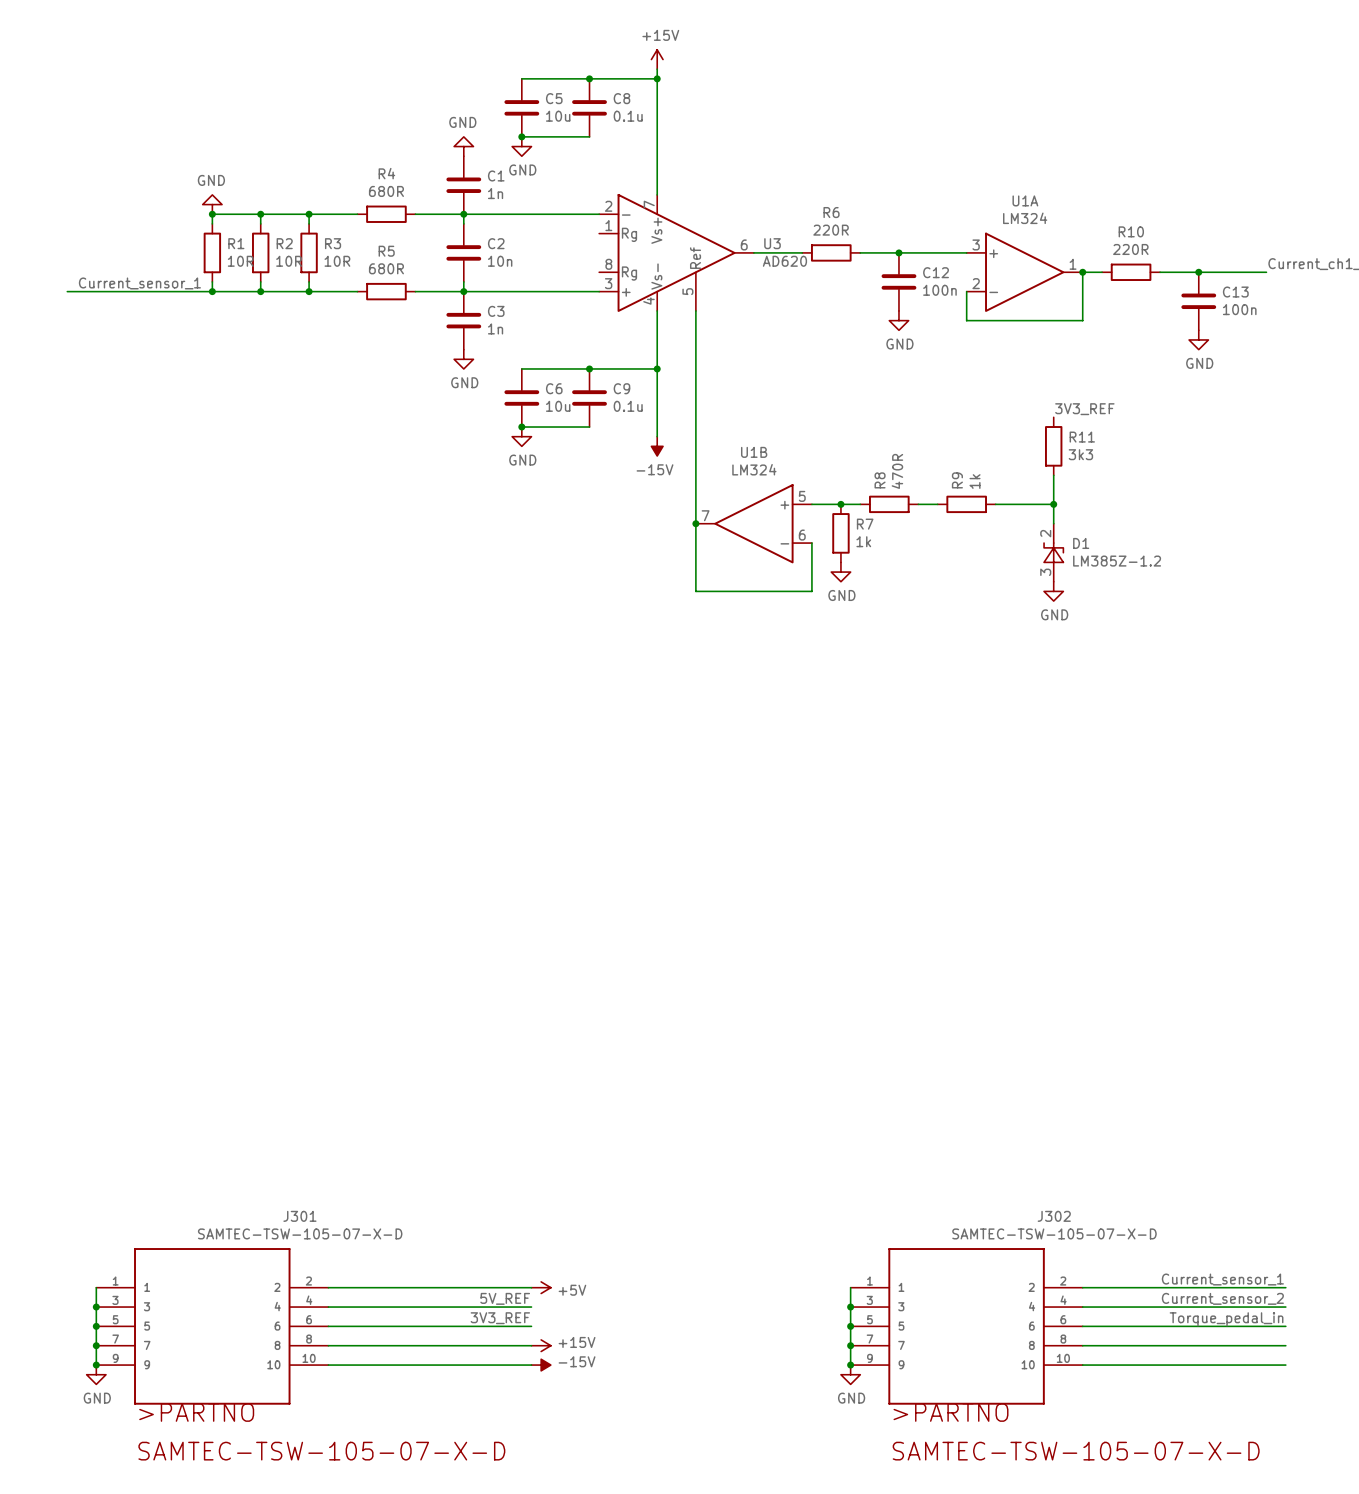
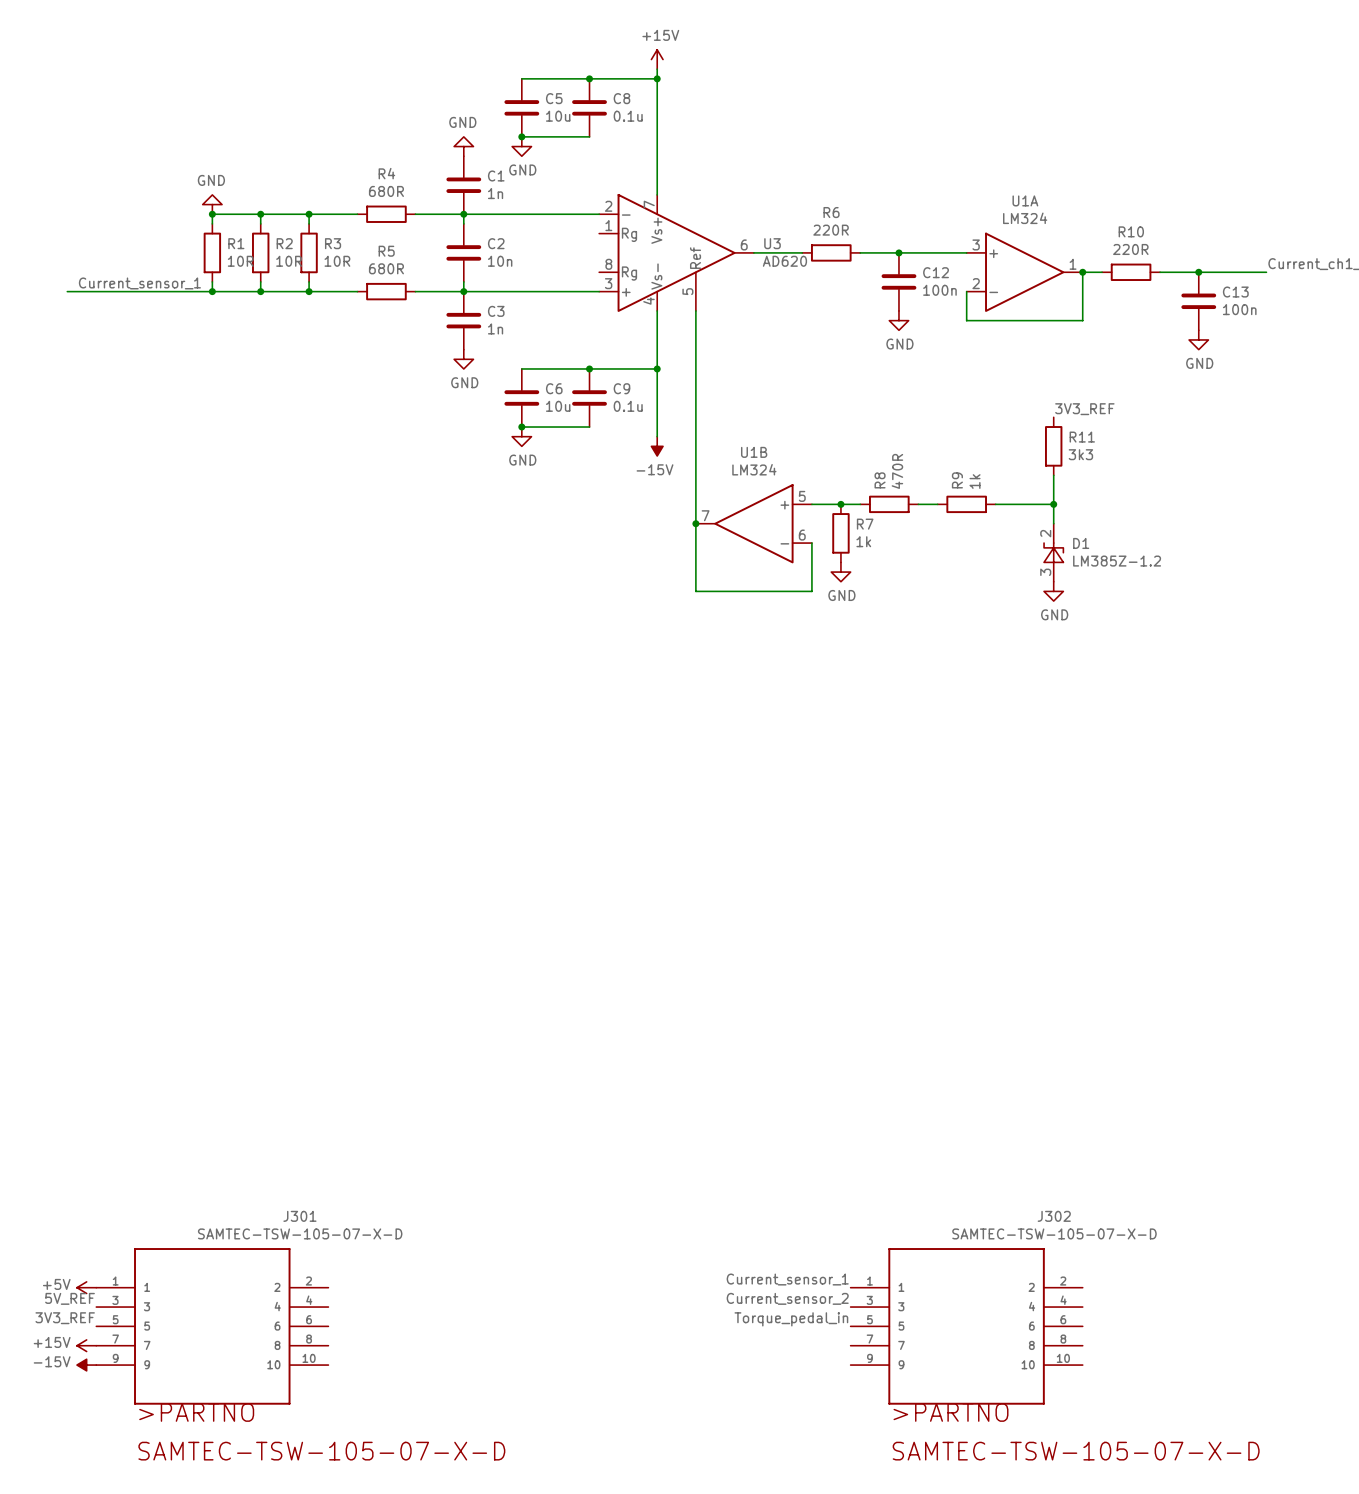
label: none -> Current_sensor_1 (787, 1279)
label: Current_sensor_1 (1222, 1279) -> none
power symbol: none -> +5V (86, 1287)
wire: (96, 1287) (96, 1365) -> none
wire: (328, 1287) (531, 1287) -> none
power symbol: +5V (541, 1287) -> none
wire: (850, 1287) (850, 1365) -> none
wire: (1082, 1287) (1285, 1287) -> none
label: none -> 5V_REF (70, 1298)
label: 5V_REF (505, 1298) -> none
label: none -> Current_sensor_2 (787, 1298)
label: Current_sensor_2 (1222, 1298) -> none
junction: (96, 1307) -> none
wire: (328, 1307) (531, 1307) -> none
junction: (850, 1307) -> none
wire: (1082, 1307) (1285, 1307) -> none
label: none -> 3V3_REF (65, 1318)
label: 3V3_REF (500, 1318) -> none
label: none -> Torque_pedal_in (791, 1319)
label: Torque_pedal_in (1226, 1319) -> none
junction: (96, 1326) -> none
wire: (328, 1326) (531, 1326) -> none
junction: (850, 1326) -> none
wire: (1082, 1326) (1285, 1326) -> none
power symbol: none -> +15V (86, 1345)
junction: (96, 1345) -> none
wire: (328, 1345) (531, 1345) -> none
power symbol: +15V (541, 1345) -> none
junction: (850, 1345) -> none
wire: (1082, 1345) (1285, 1345) -> none
power symbol: none -> -15V (86, 1365)
junction: (96, 1365) -> none
wire: (328, 1365) (531, 1365) -> none
power symbol: -15V (541, 1365) -> none
junction: (850, 1365) -> none
wire: (1082, 1365) (1285, 1365) -> none
power symbol: GND (96, 1374) -> none
power symbol: GND (850, 1374) -> none

